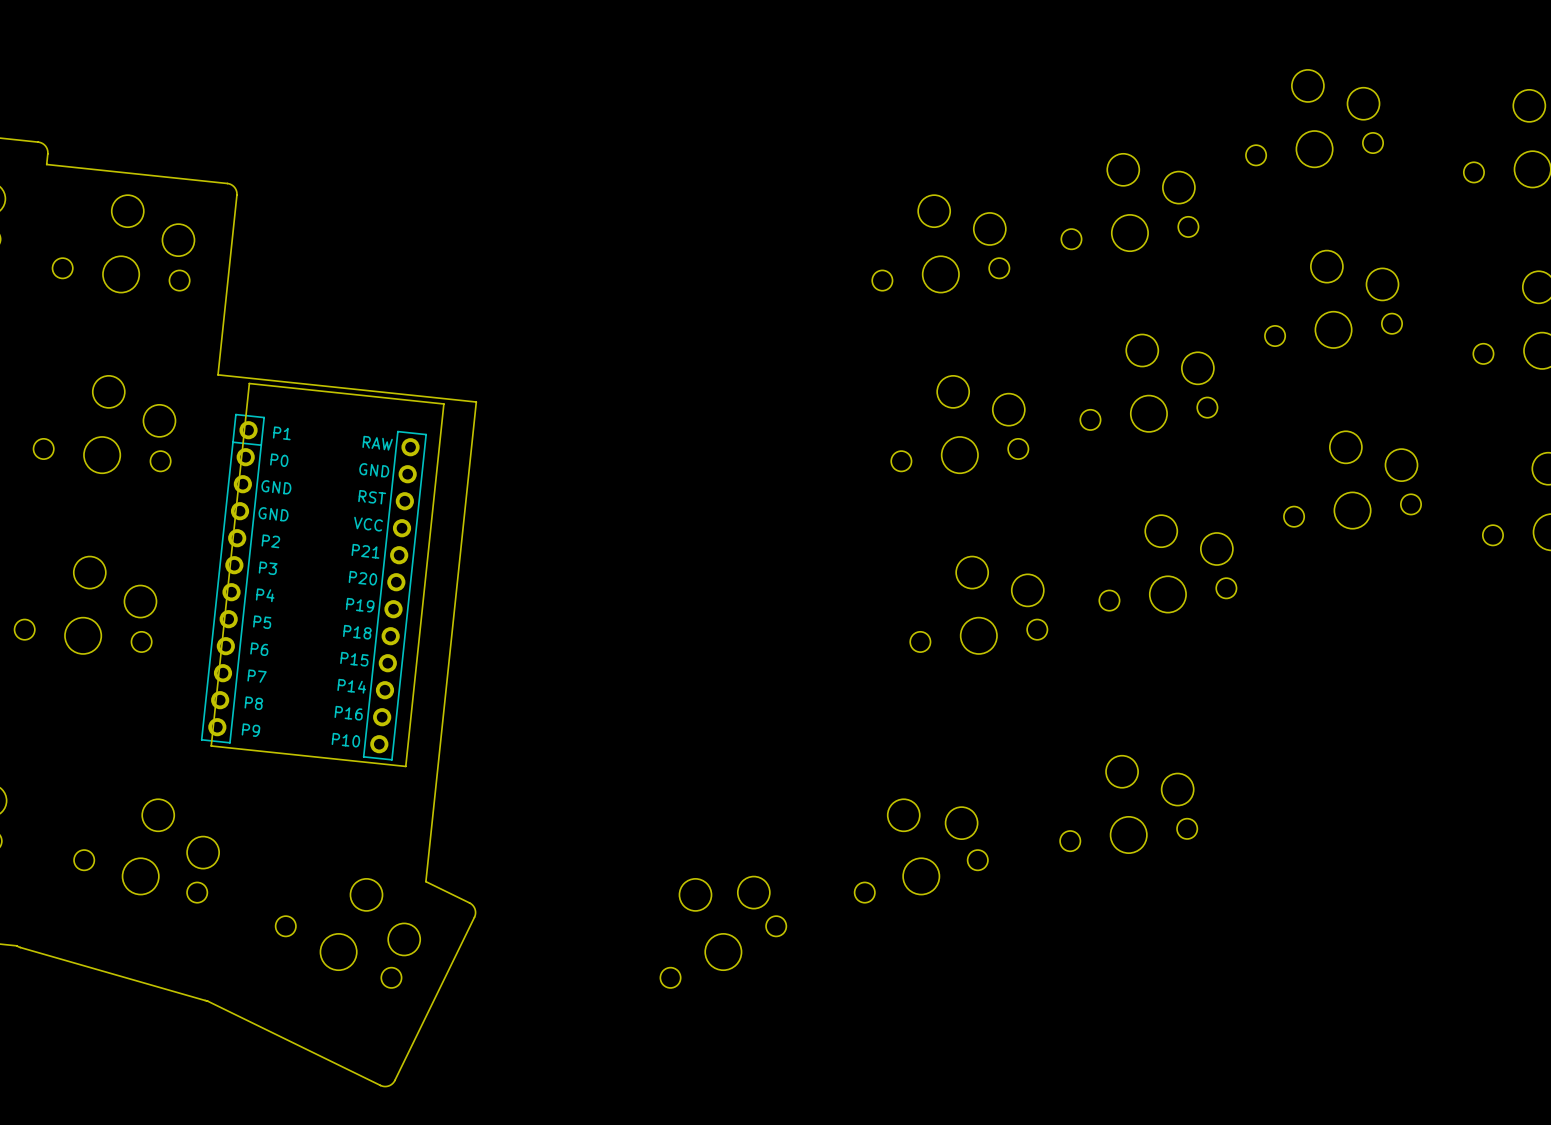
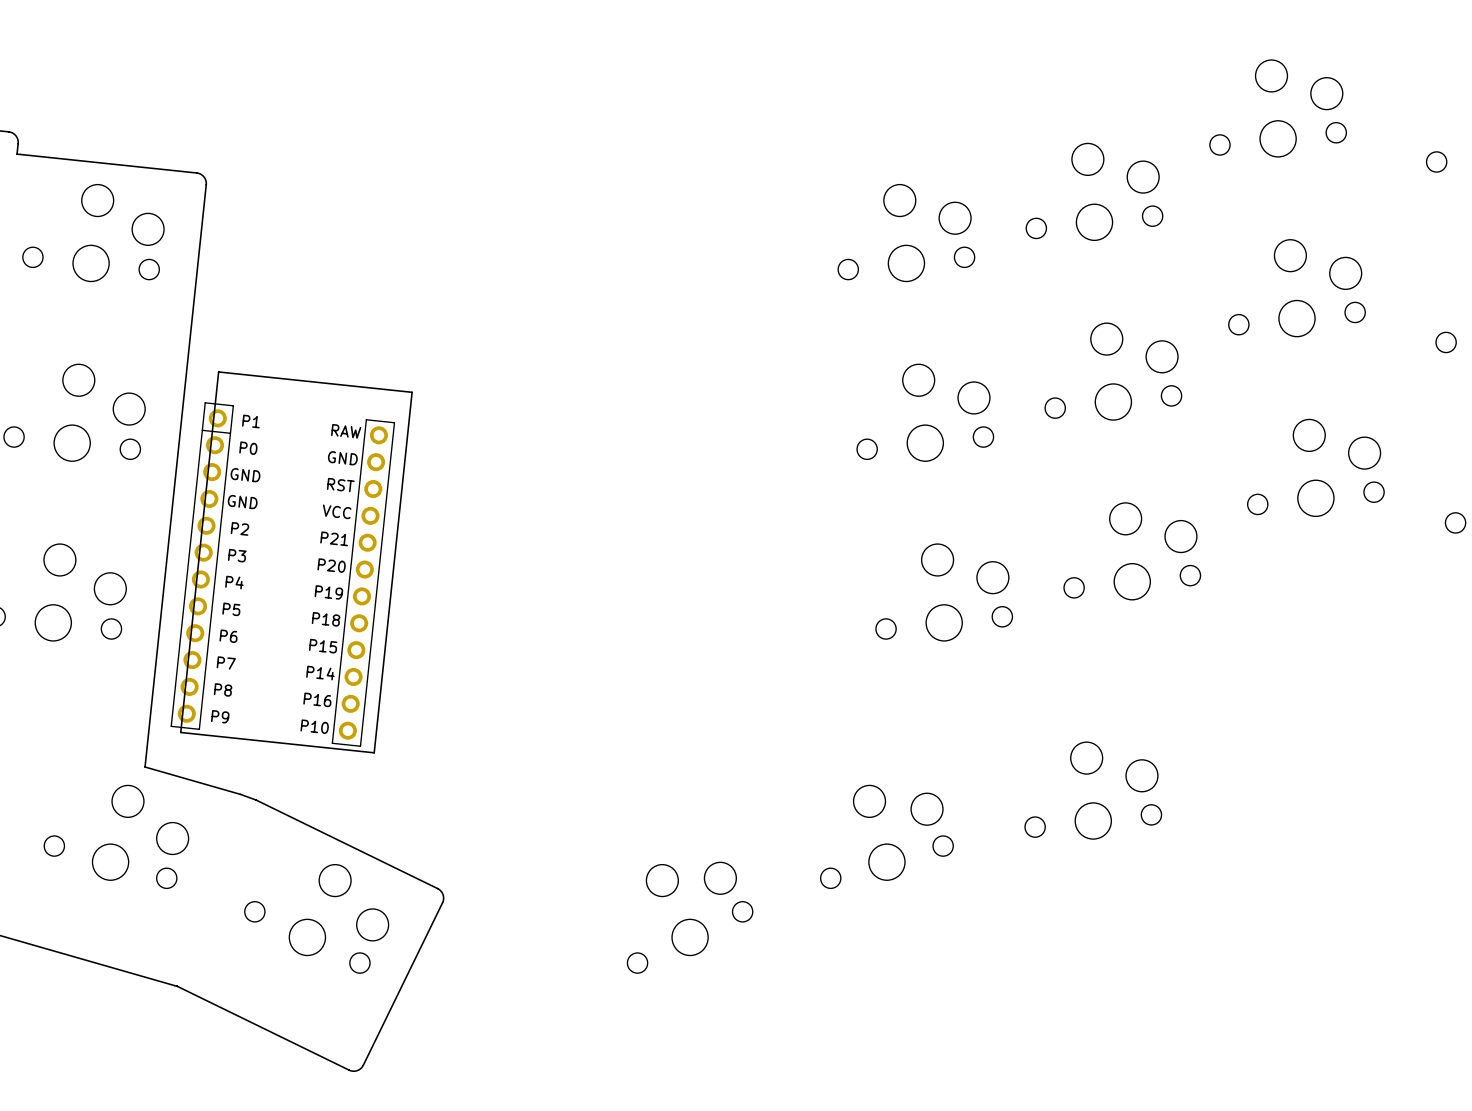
board edge: (218, 374) (476, 402) (425, 881) -> (187, 363) (145, 767) (256, 800) (394, 867)

